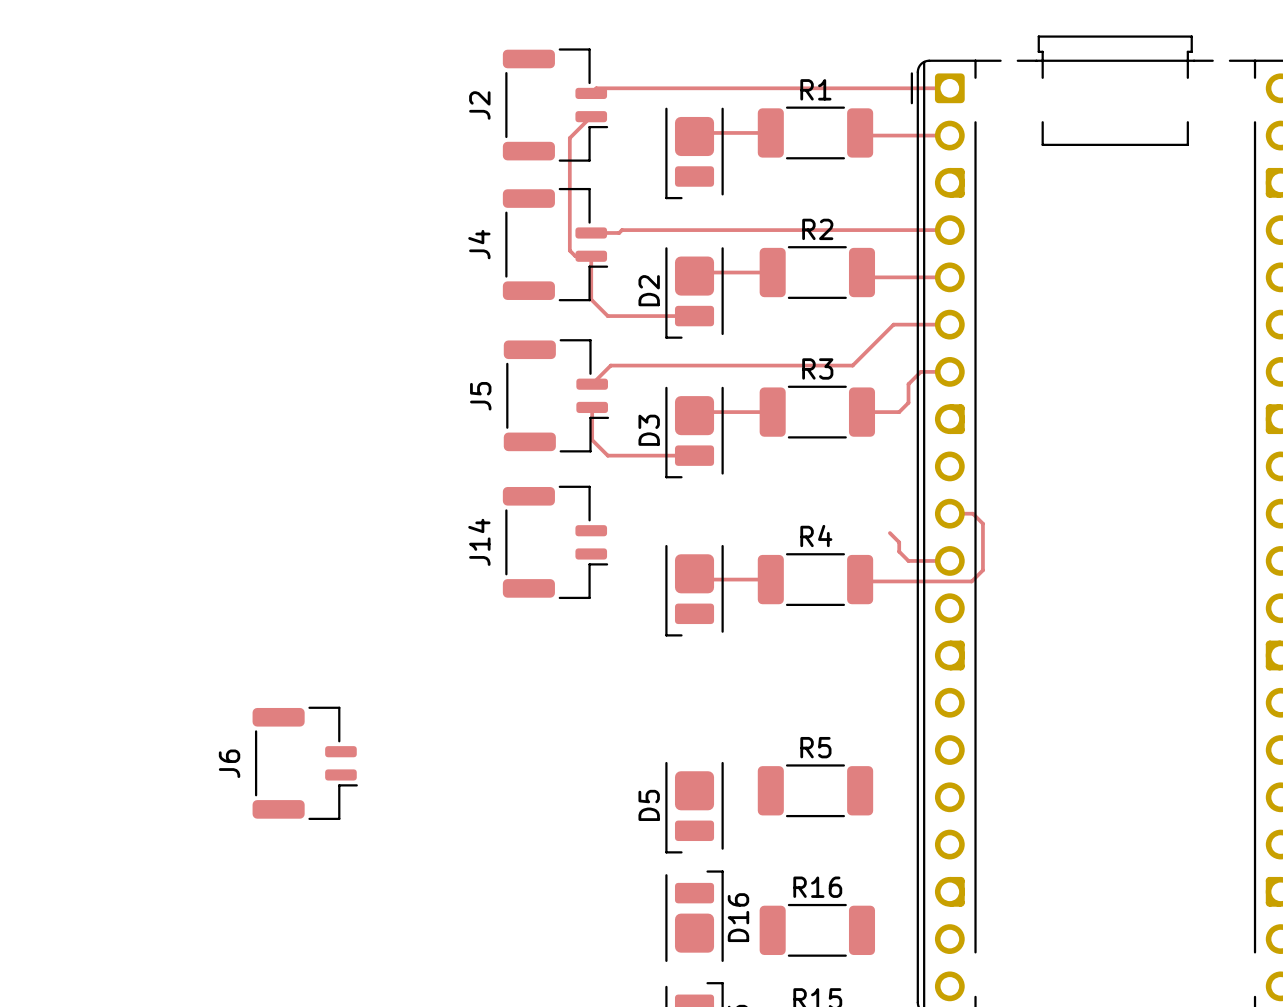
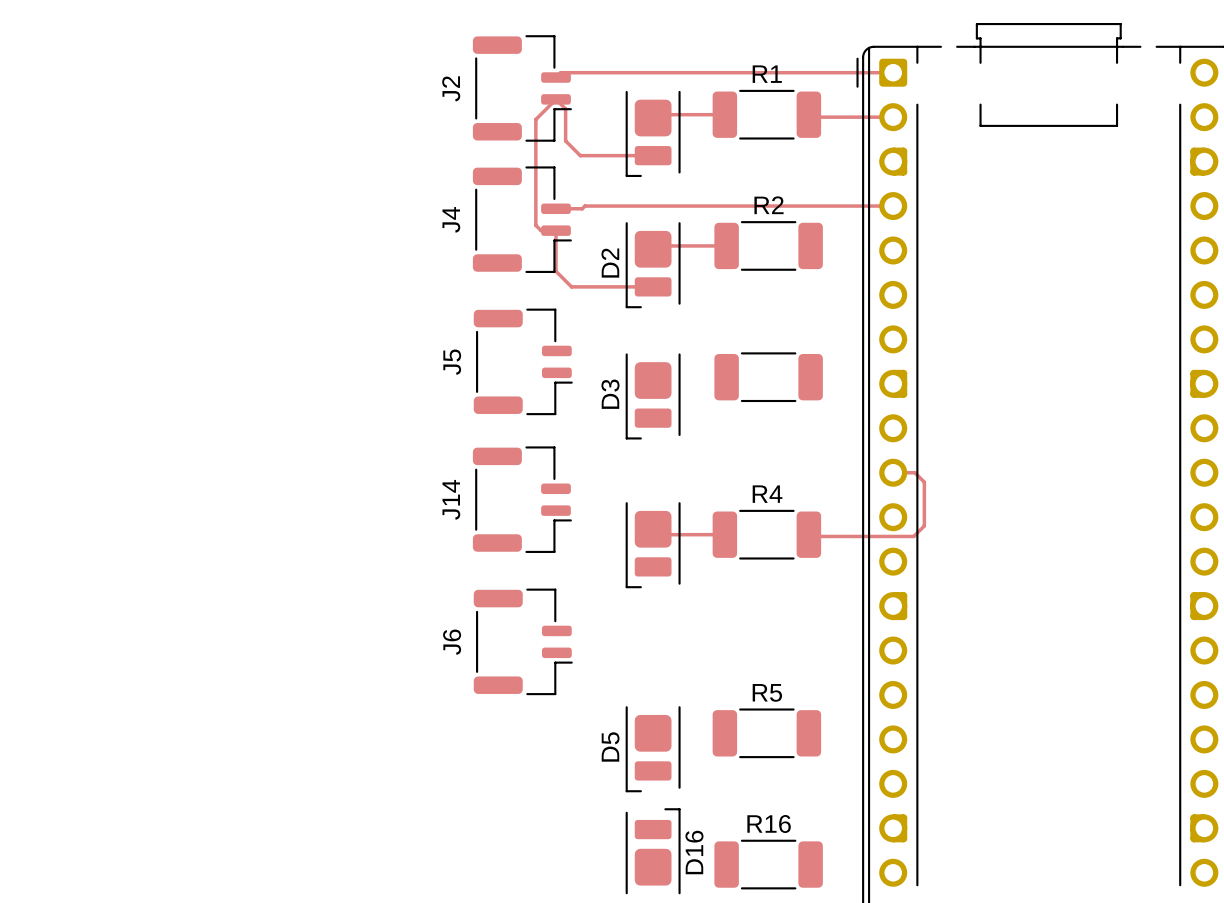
track: none -> (556, 99) (565, 109) (565, 140) (580, 155) (653, 155)
track: (866, 277) (949, 277) -> none
track: (949, 324) (893, 324) (852, 365) (610, 365) (592, 384) -> none
R3 name: R3 (817, 368) -> none
track: (949, 371) (920, 371) (908, 384) (908, 402) (899, 412) (861, 412) -> none
track: (592, 407) (592, 440) (607, 455) (694, 455) -> none
track: (698, 412) (772, 412) -> none
track: (889, 533) (899, 542) (899, 551) (908, 560) (949, 560) -> none
J6 position: (305, 763) -> (523, 641)

